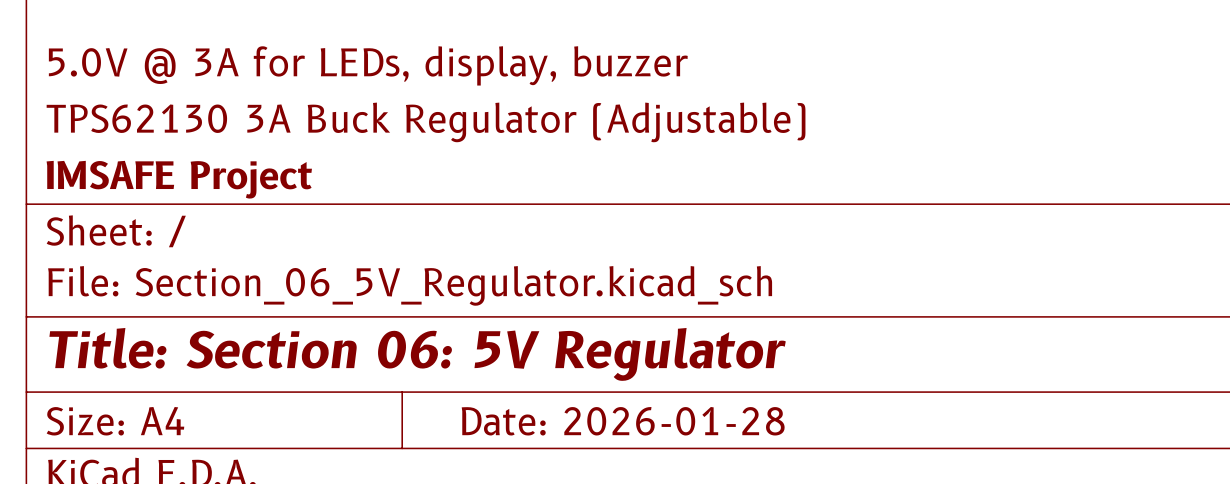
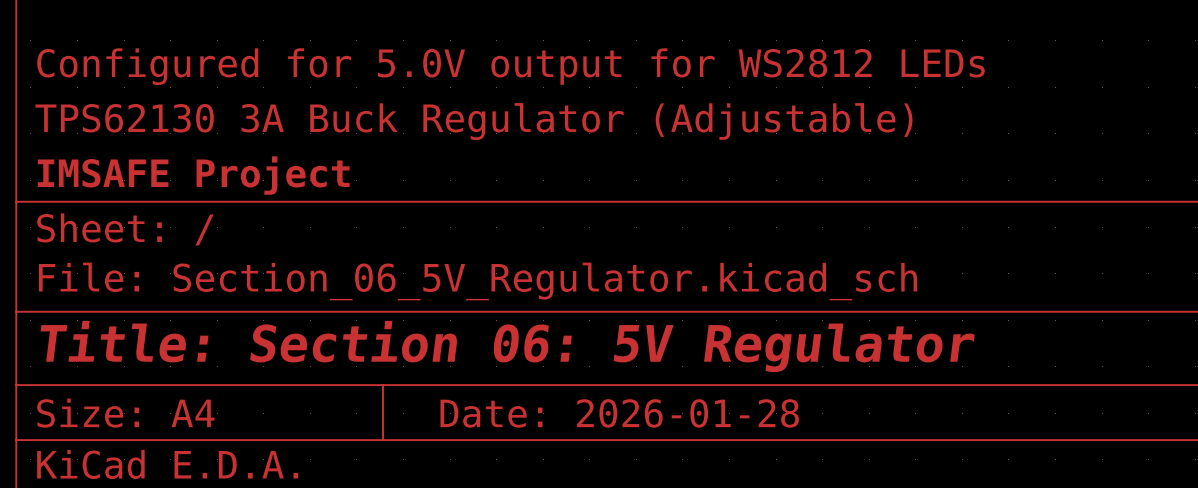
title block: 5.0V @ 3A for LEDs, display, buzzer (368, 65) -> Configured for 5.0V output for WS2812 LEDs (510, 66)

